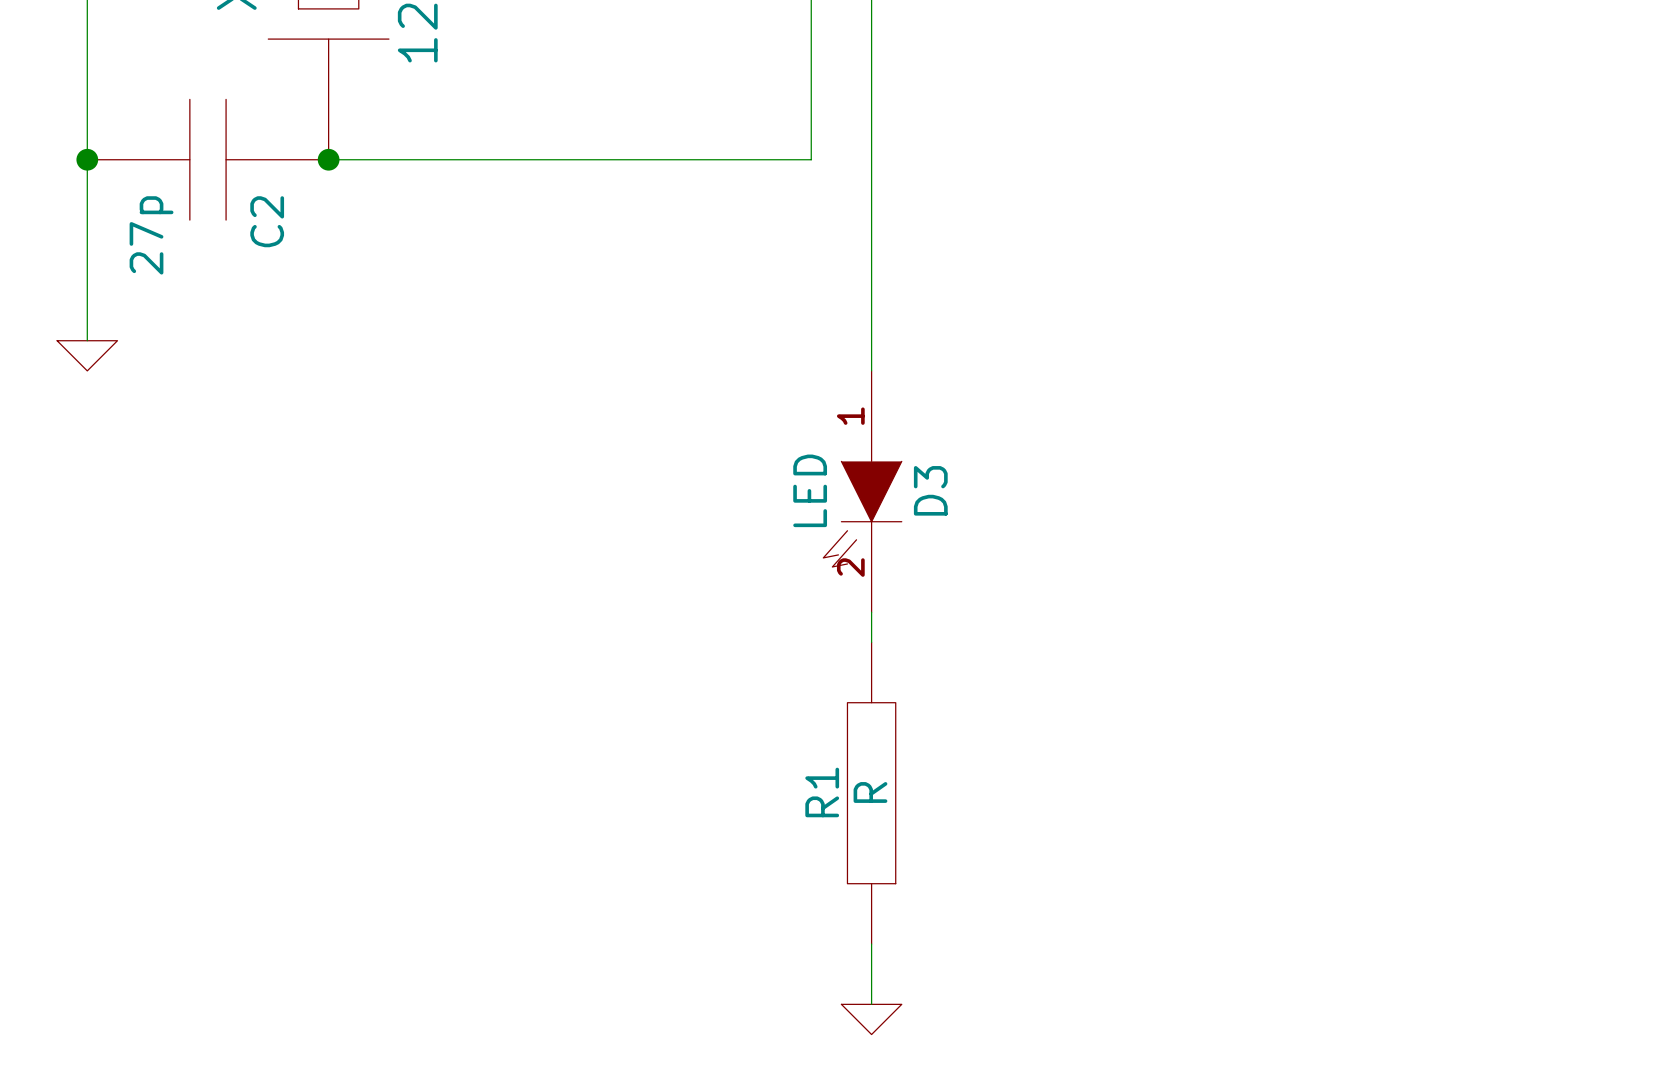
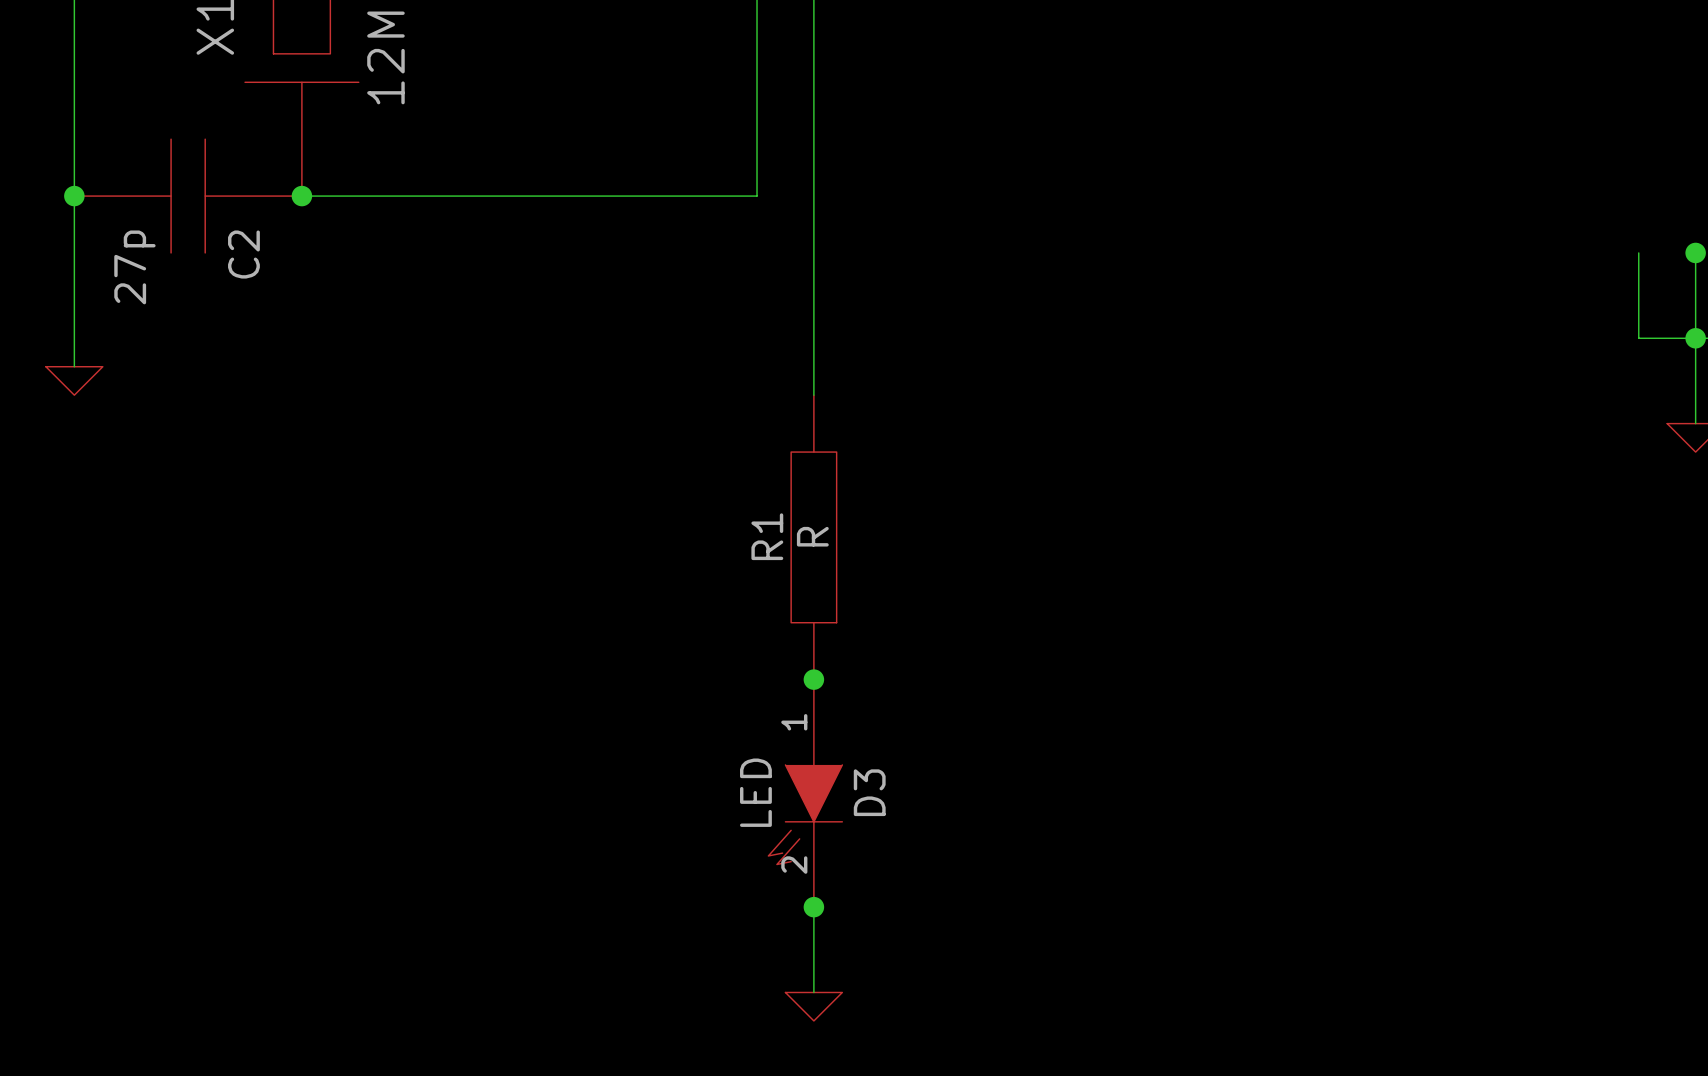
D3 position: (862, 491) -> (805, 793)
junction: none -> (813, 679)
R1 position: (871, 793) -> (813, 537)
junction: none -> (813, 907)

